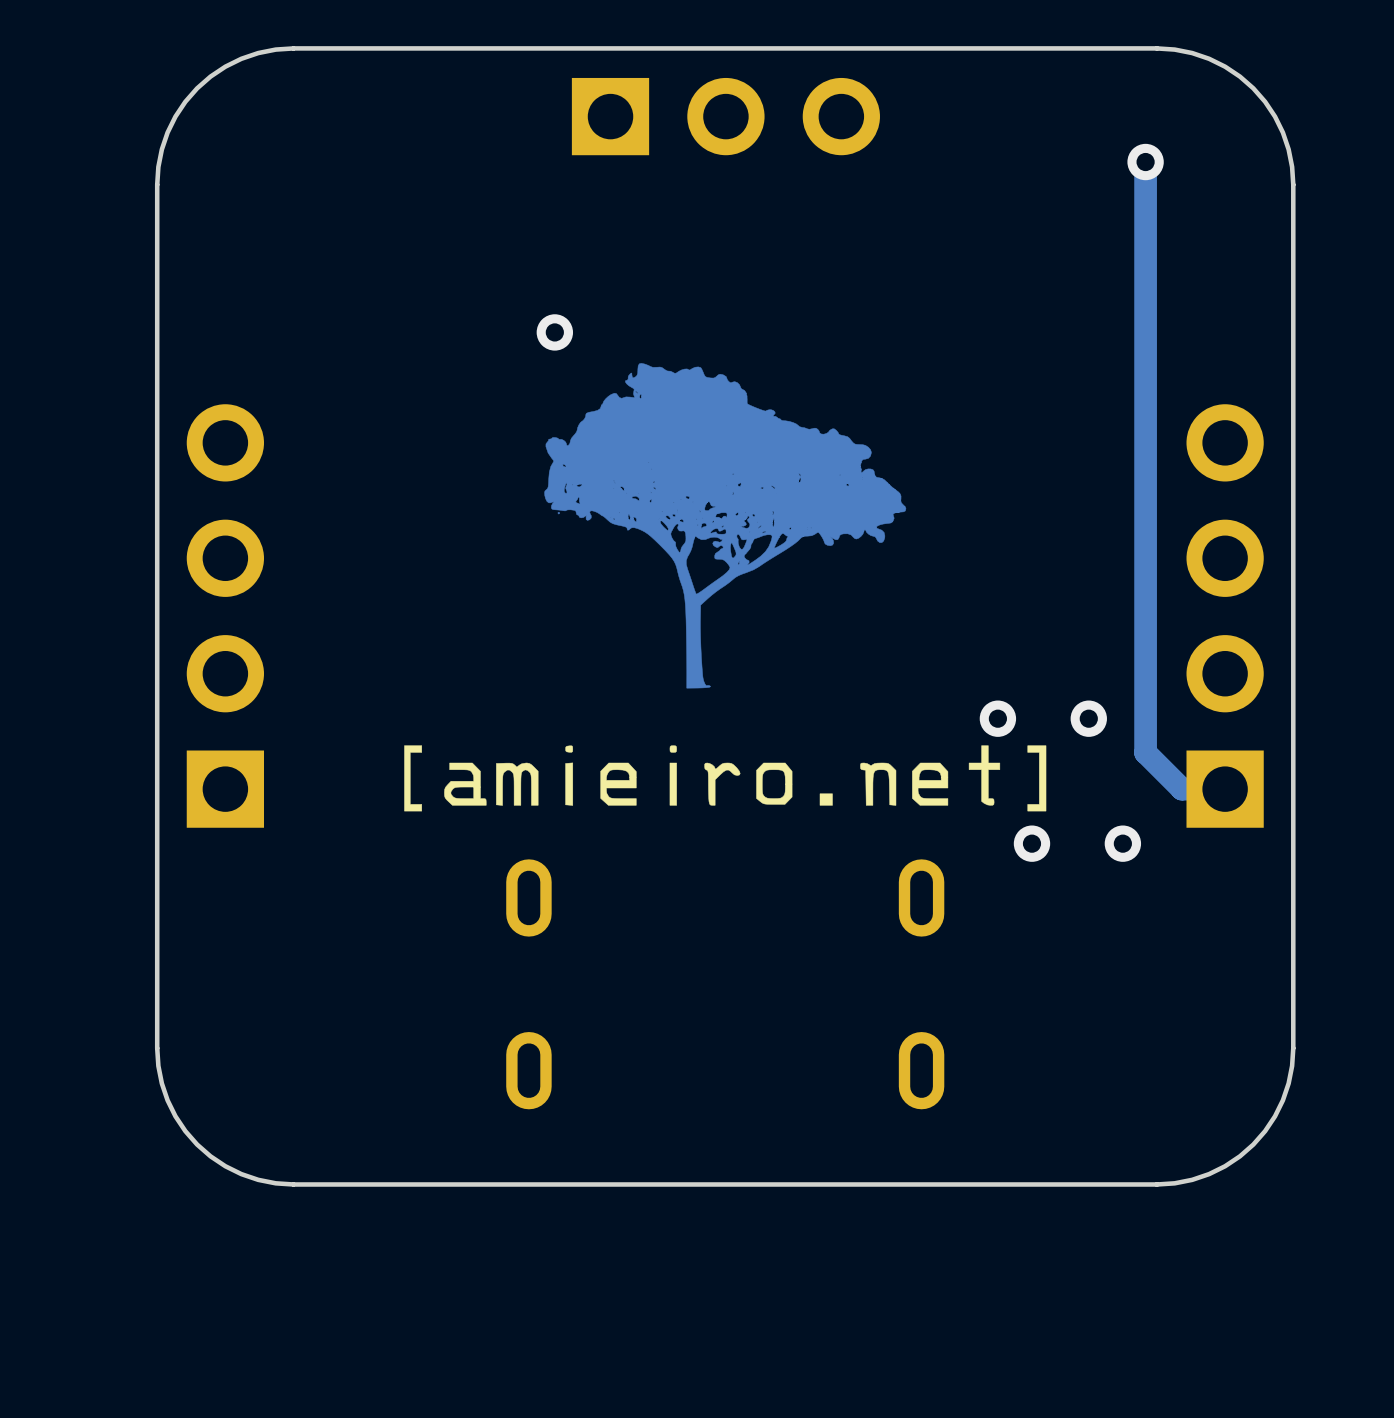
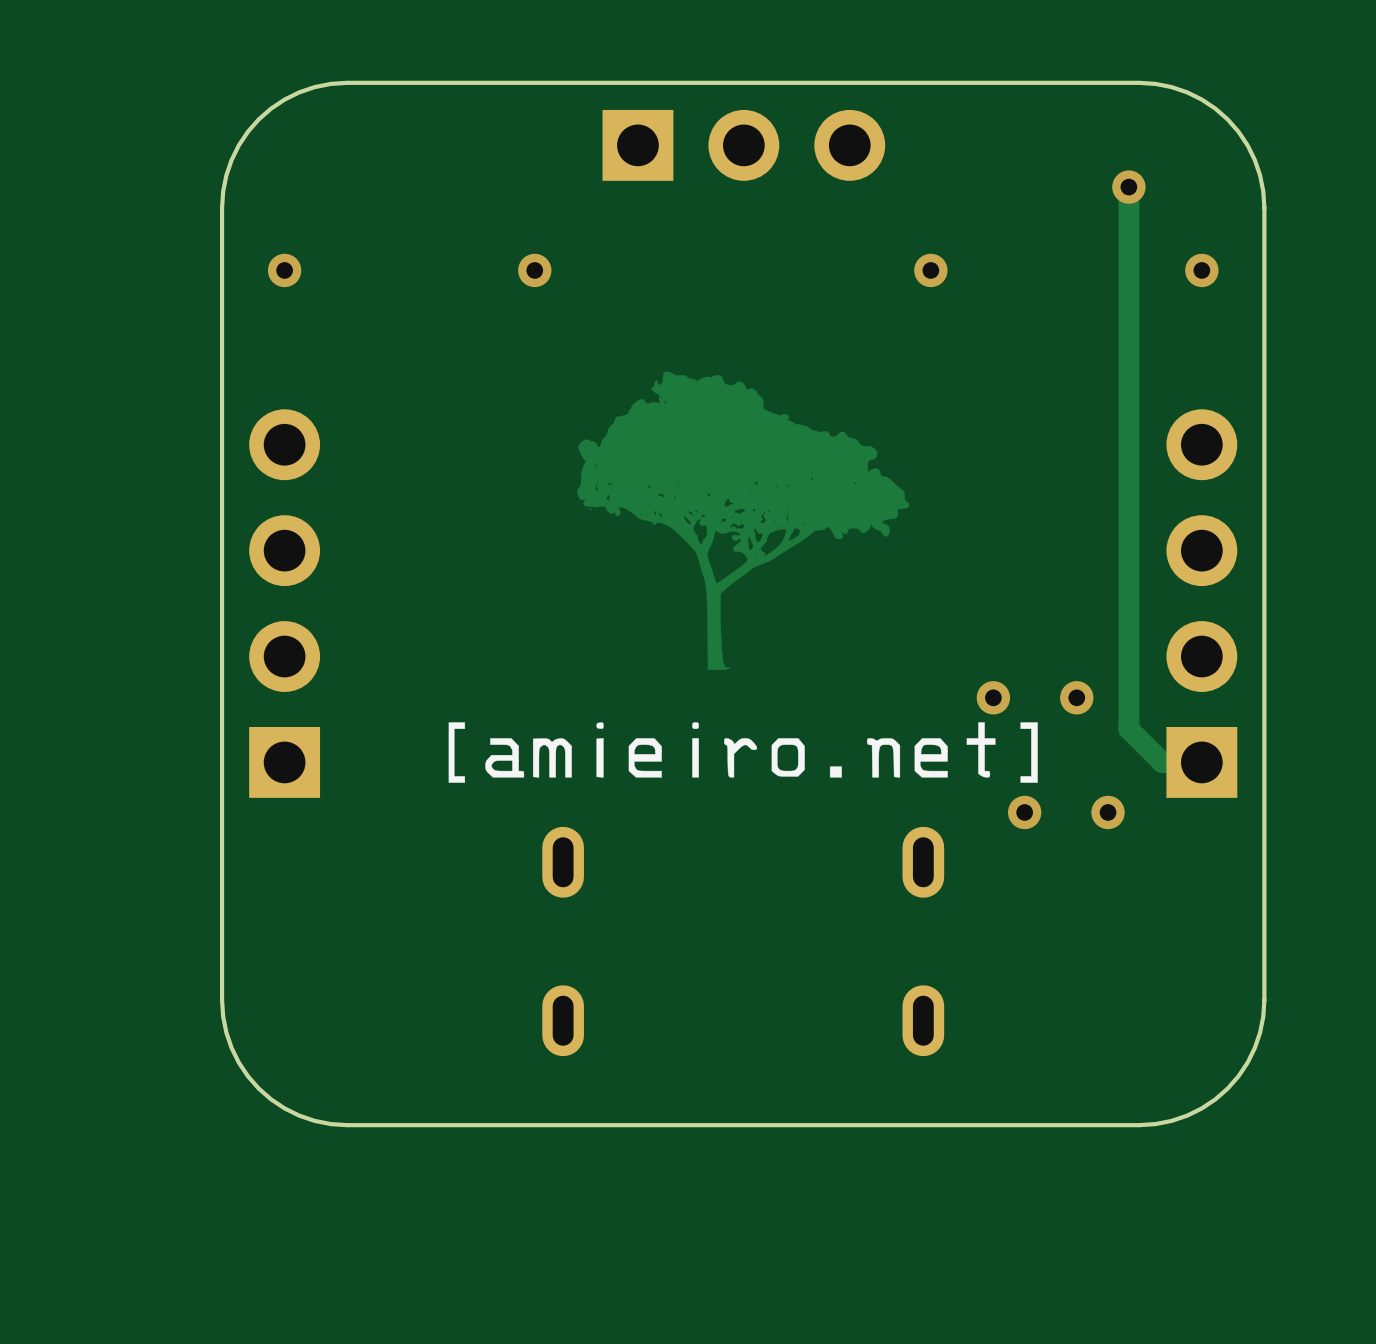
via: none -> (284, 270)
via: none -> (930, 270)
via: none -> (1201, 270)
via position: (554, 332) -> (534, 270)

